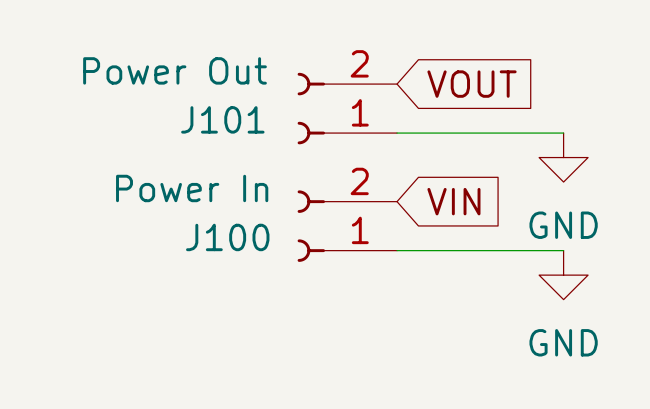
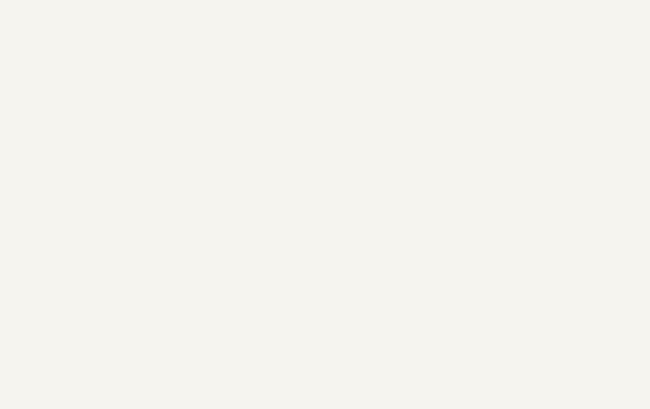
global label: VOUT (472, 84) -> none
J101: Power Out (347, 108) -> none
wire: (397, 133) (563, 133) -> none
power symbol: GND (563, 157) -> none
global label: VIN (453, 201) -> none
J100: Power In (347, 226) -> none
wire: (397, 250) (563, 250) -> none
power symbol: GND (563, 275) -> none

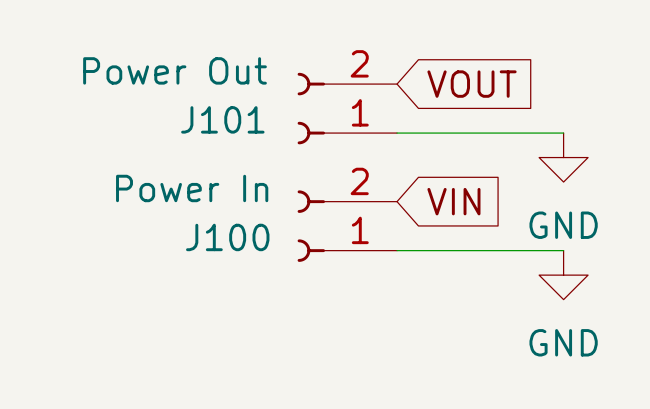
global label: none -> VOUT (472, 84)
J101: none -> Power Out (347, 108)
wire: none -> (397, 133) (563, 133)
power symbol: none -> GND (563, 157)
global label: none -> VIN (453, 201)
J100: none -> Power In (347, 226)
wire: none -> (397, 250) (563, 250)
power symbol: none -> GND (563, 275)

